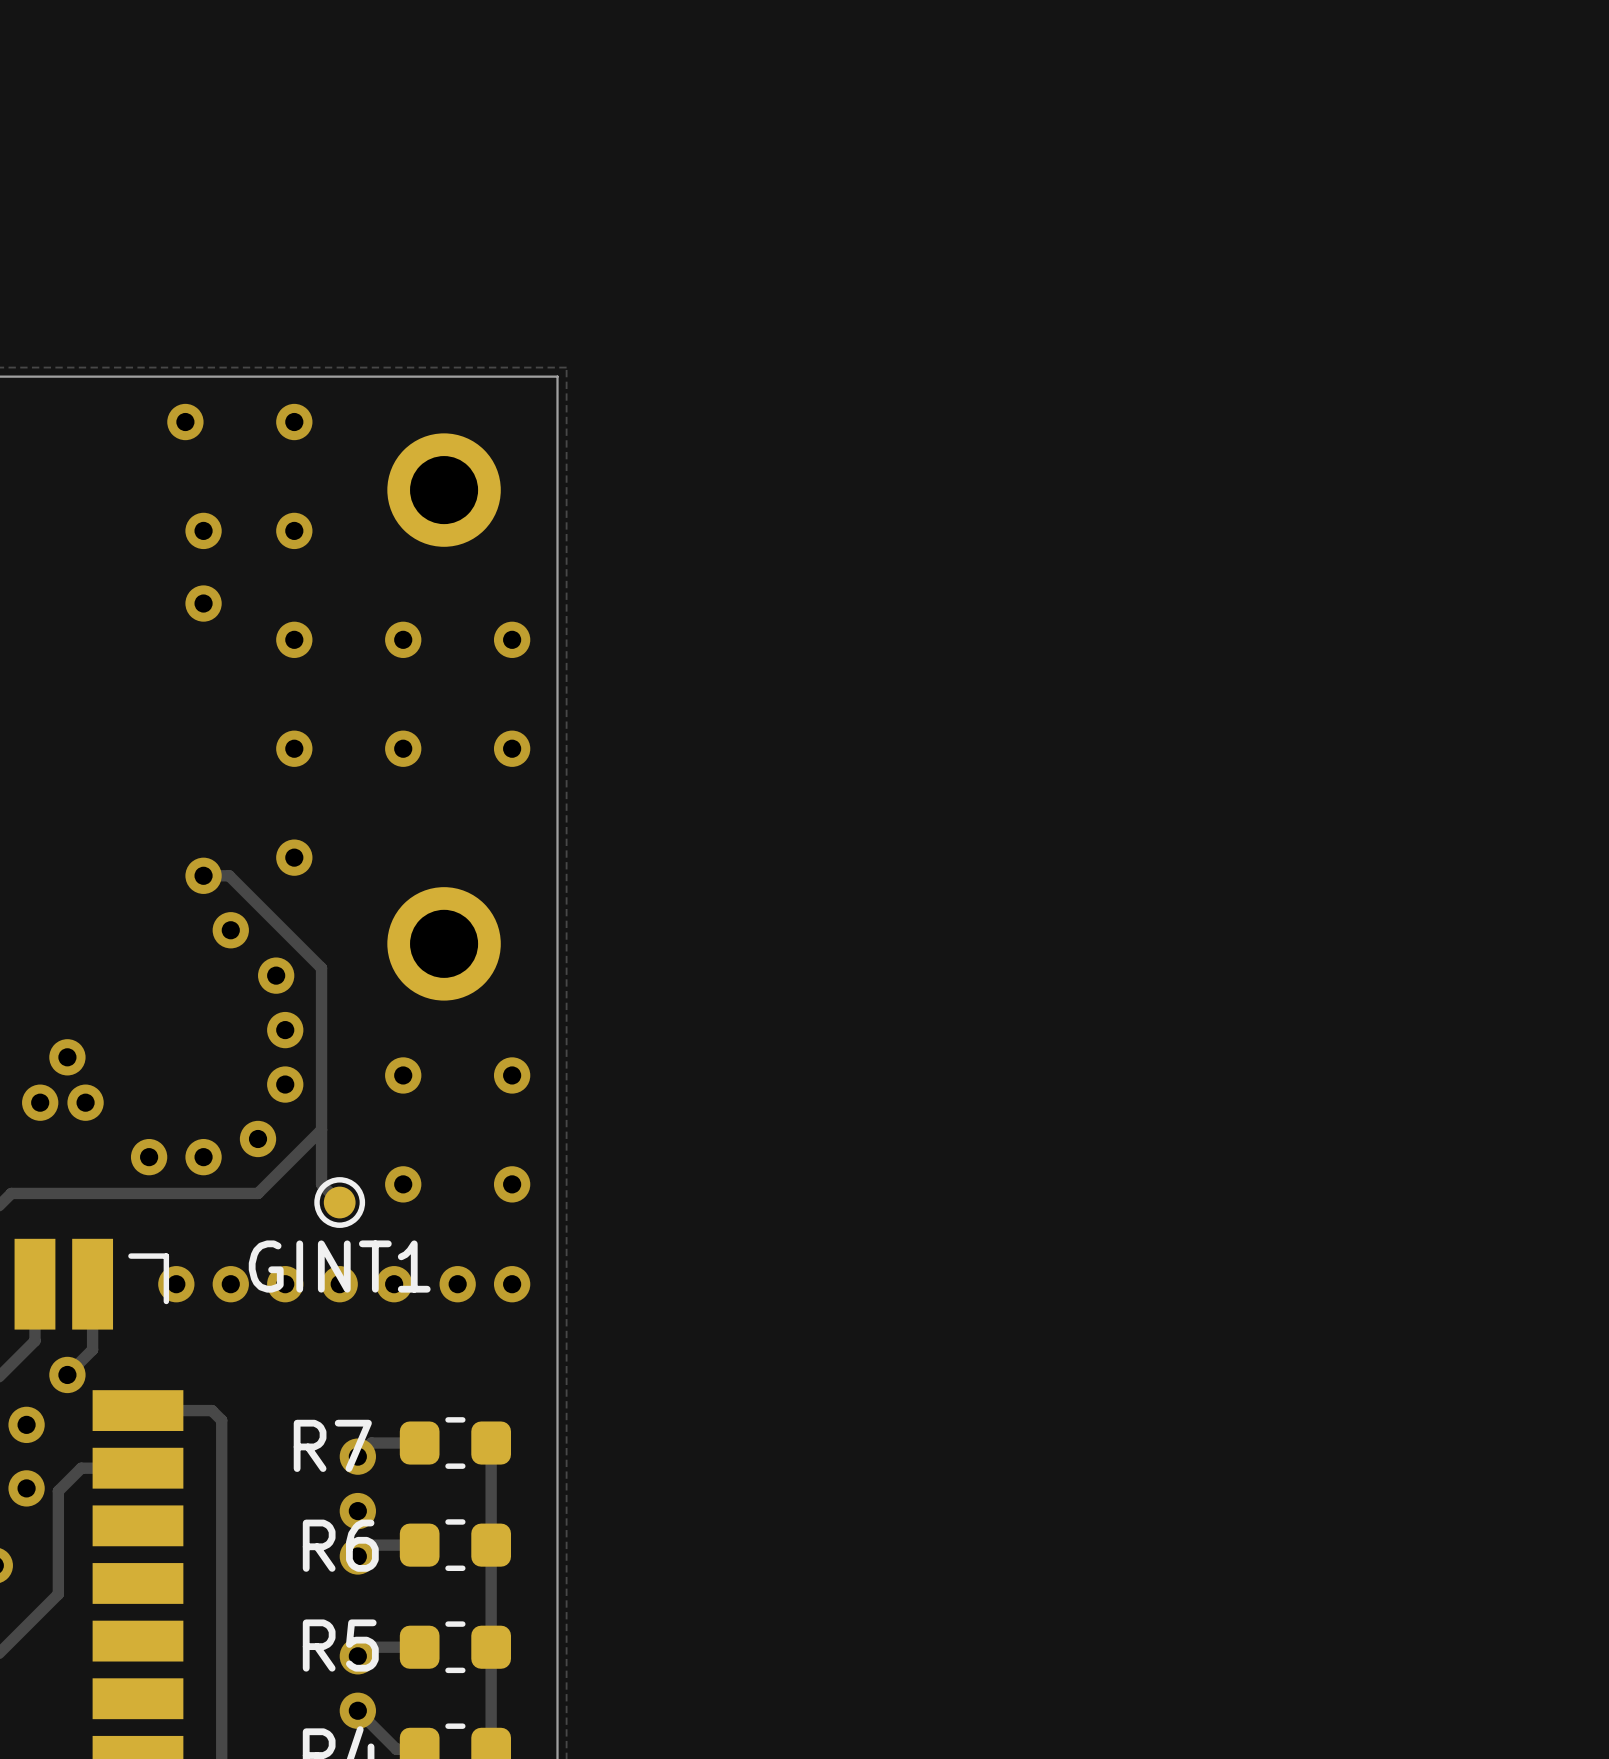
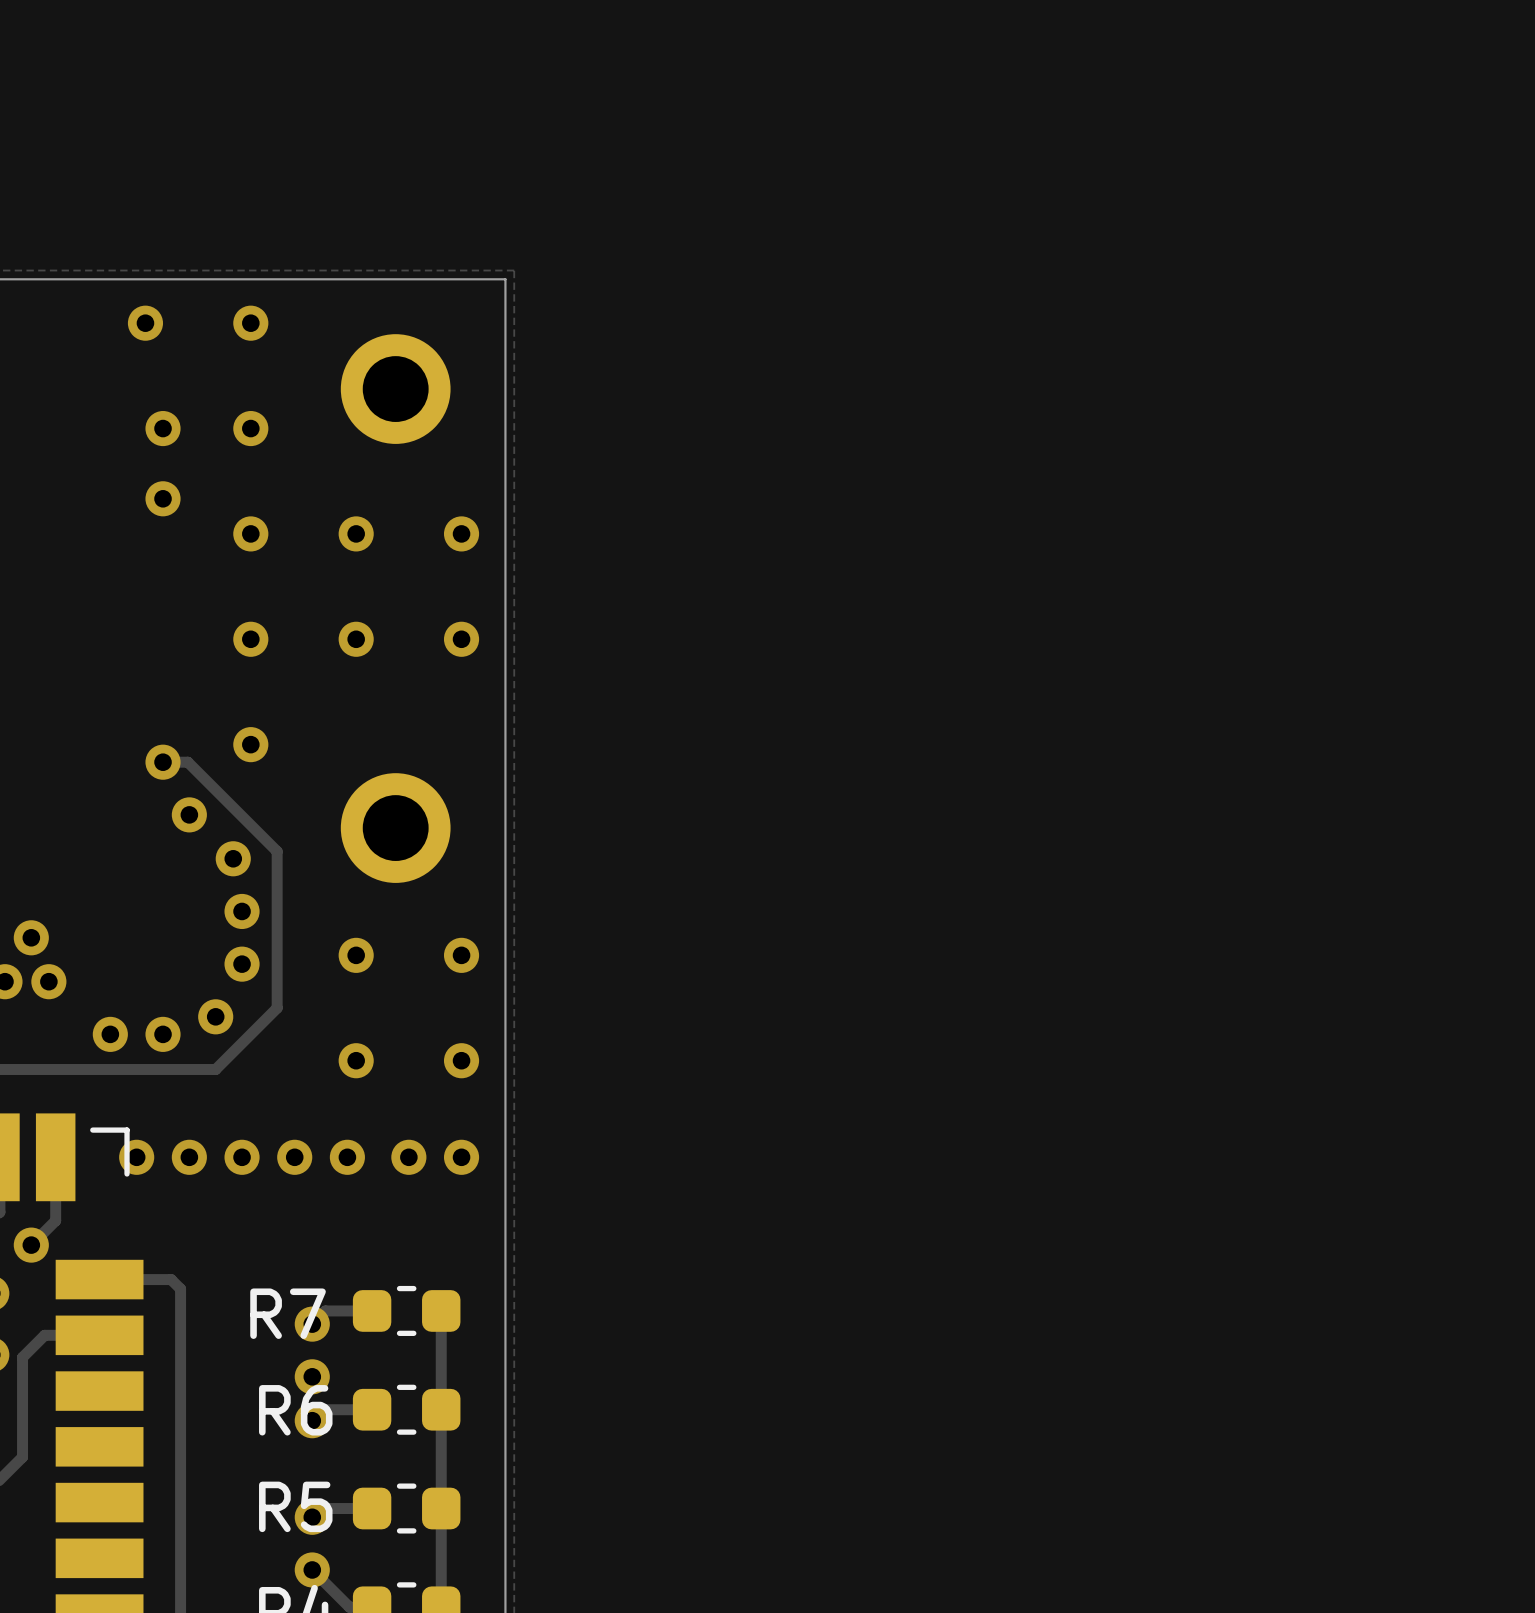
track: (321, 1129) (321, 1184) (339, 1202) -> none
GINT1: (339, 1202) -> none

